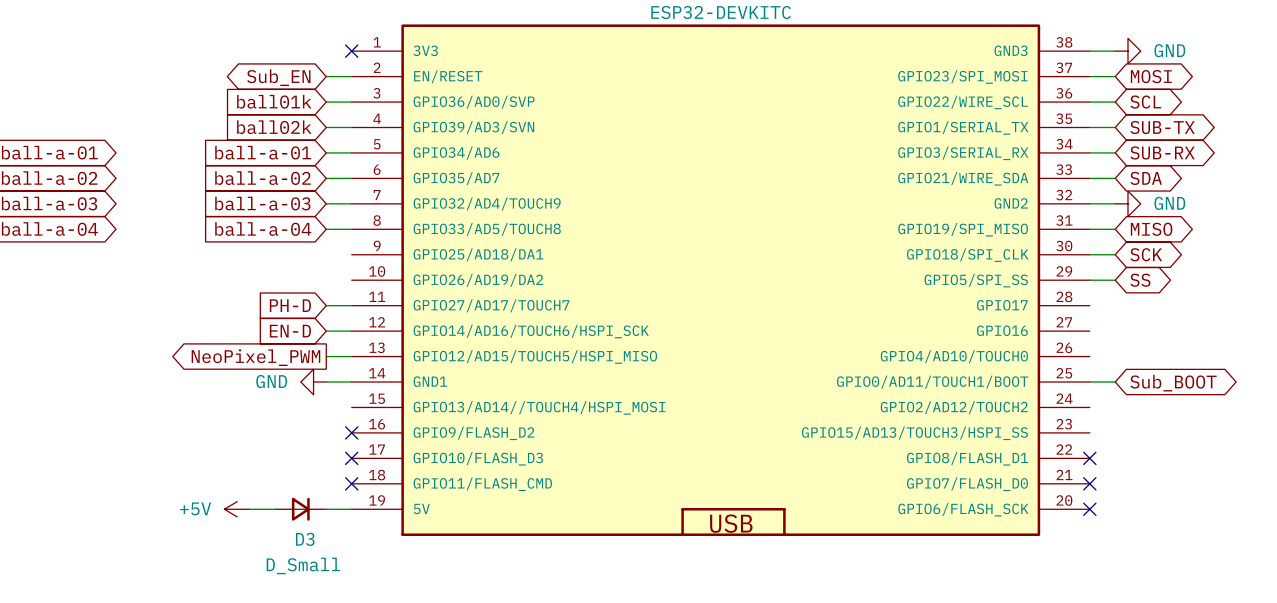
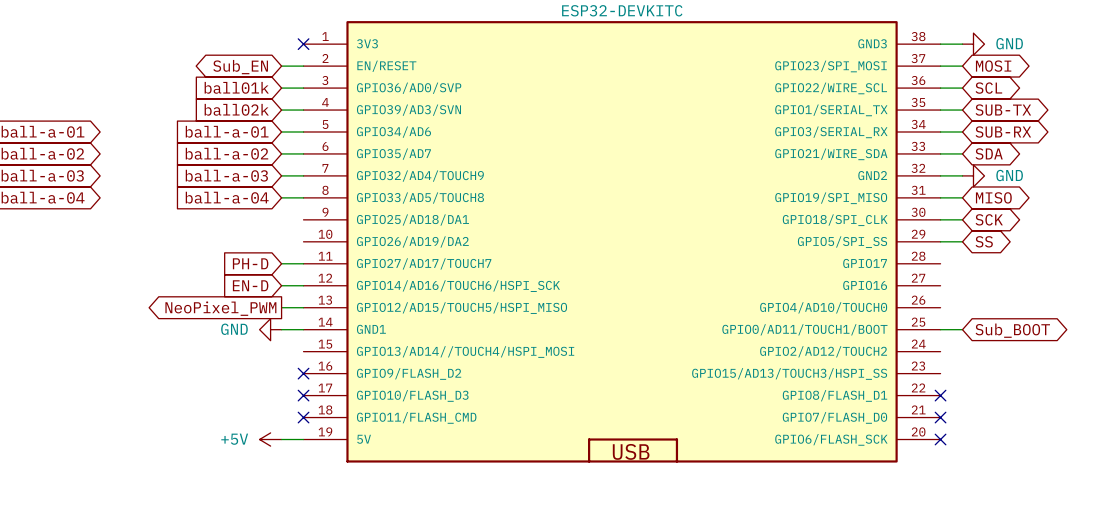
power symbol position: +5V (237, 509) -> +5V (270, 439)
wire: (249, 509) (275, 509) -> none
D3: D_Small (300, 509) -> none

